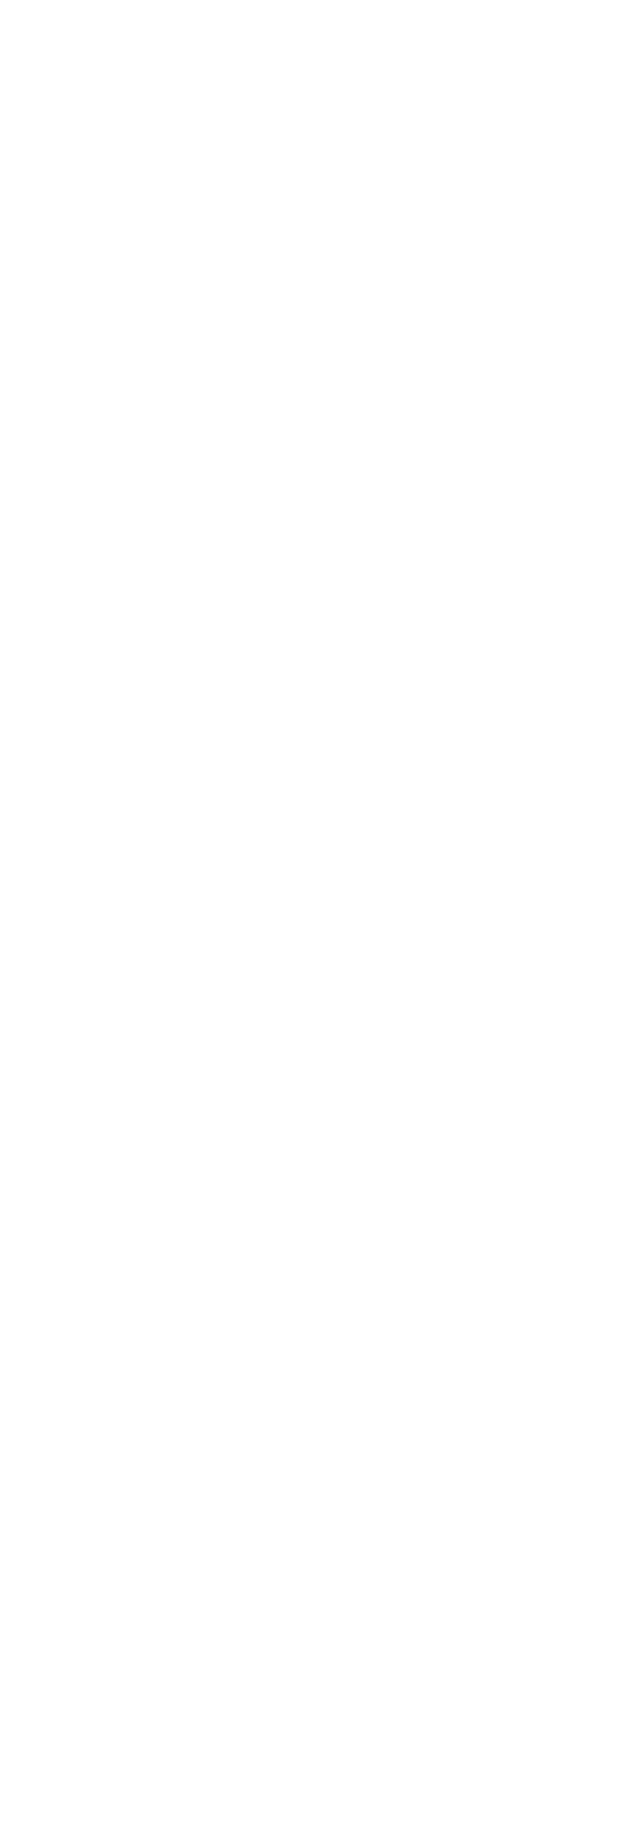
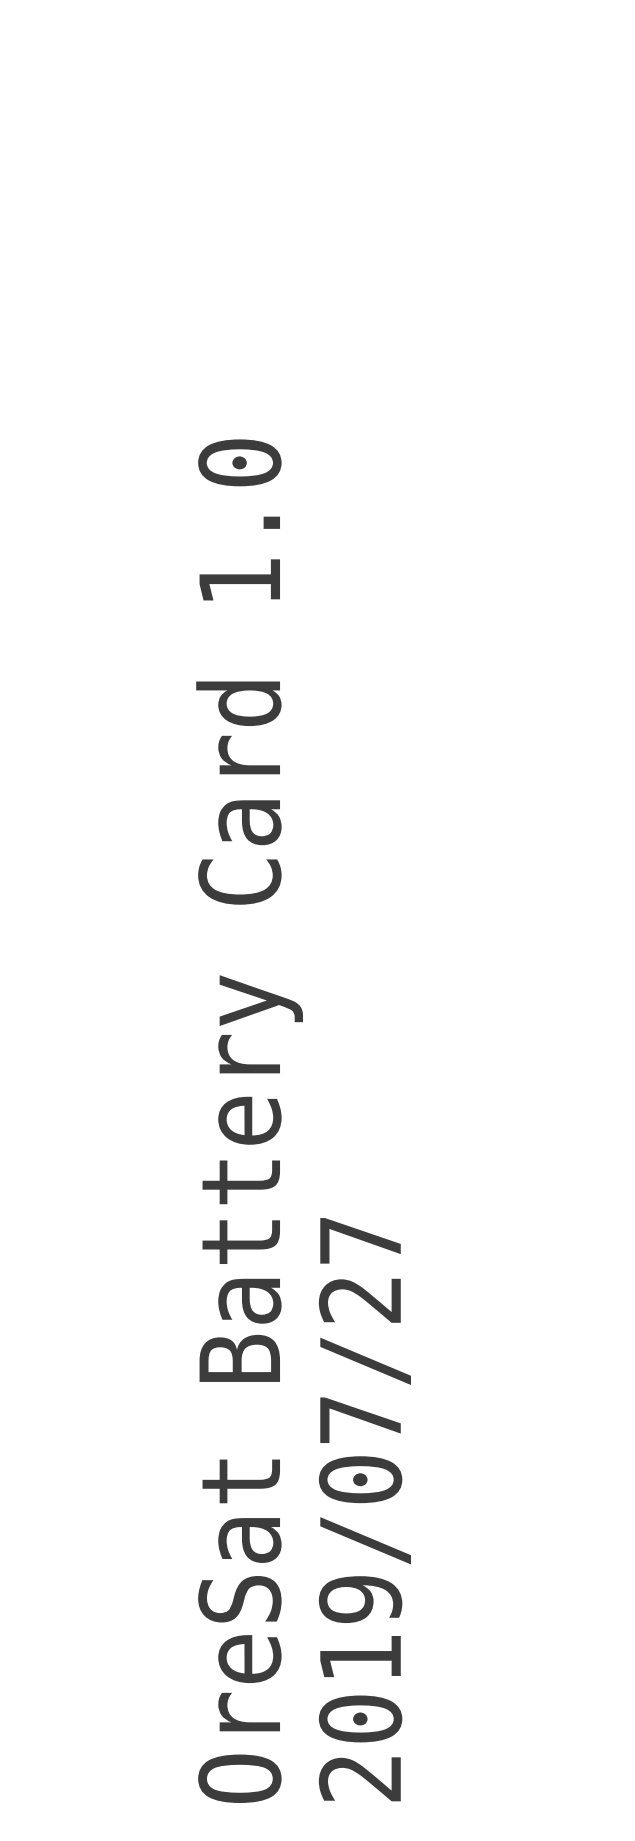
text: none -> OreSat Battery Card 1.0 (249, 1121)
text: none -> 2019/07/27 (364, 1509)

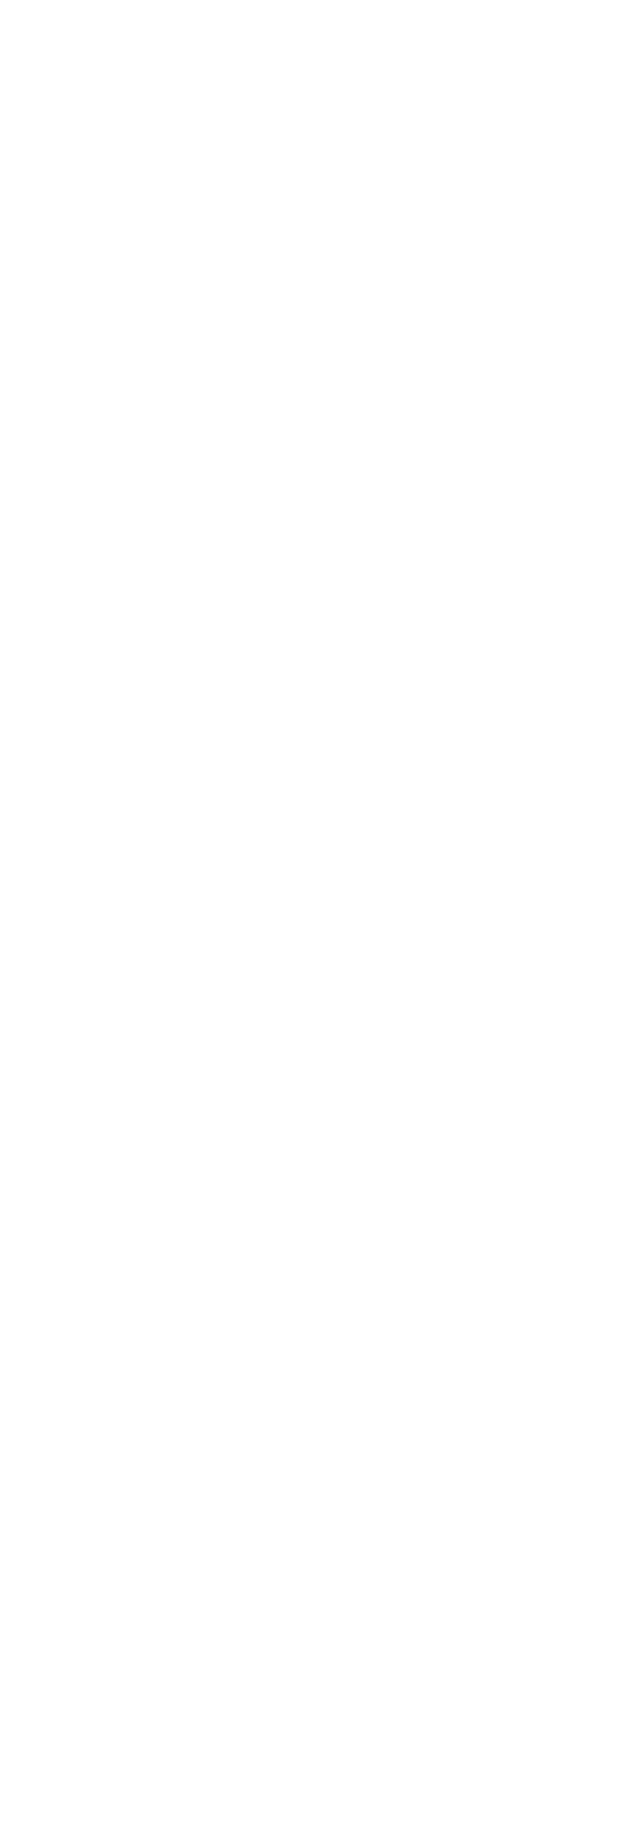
text: OreSat Battery Card 1.0 (249, 1121) -> none
text: 2019/07/27 (364, 1509) -> none

